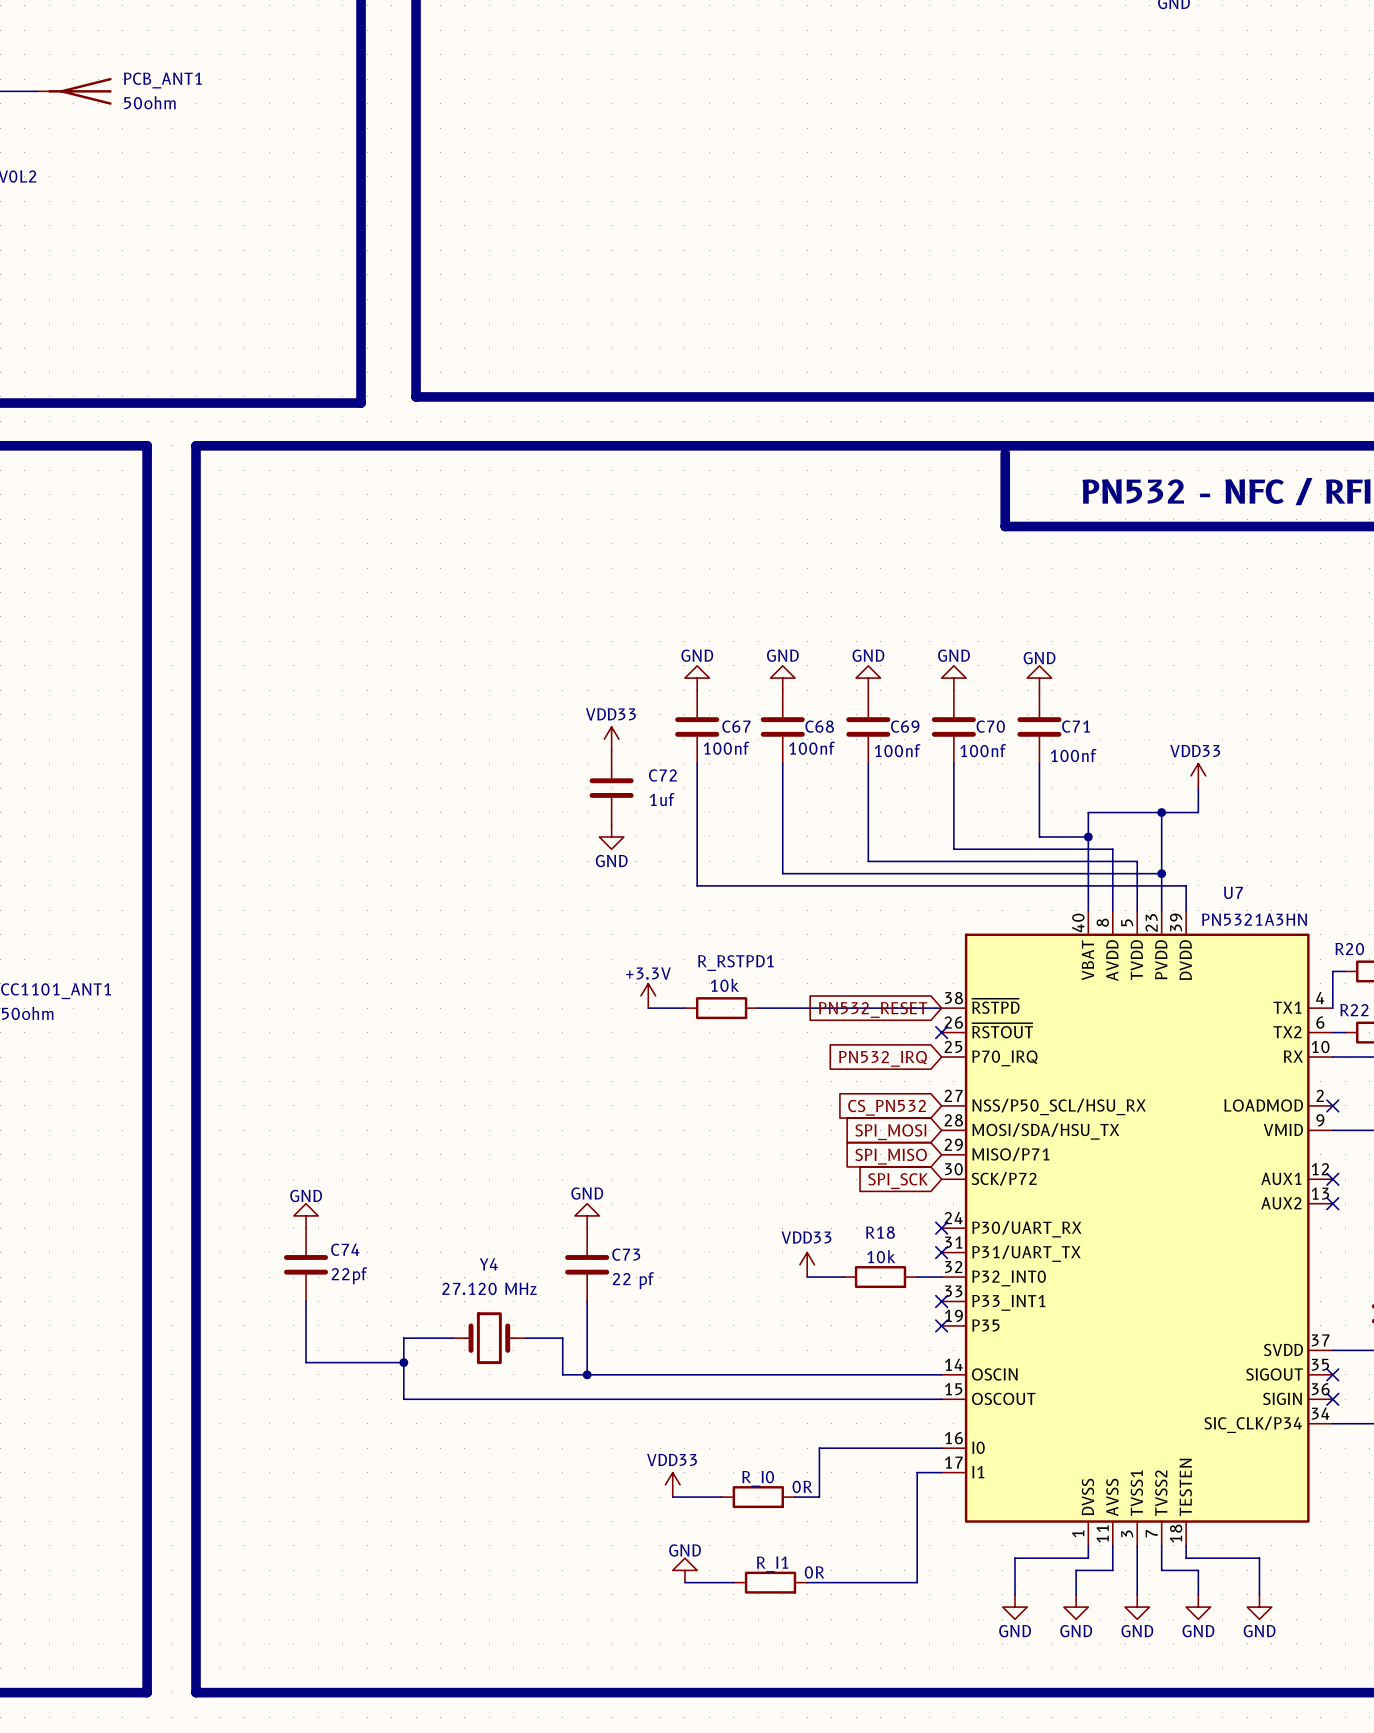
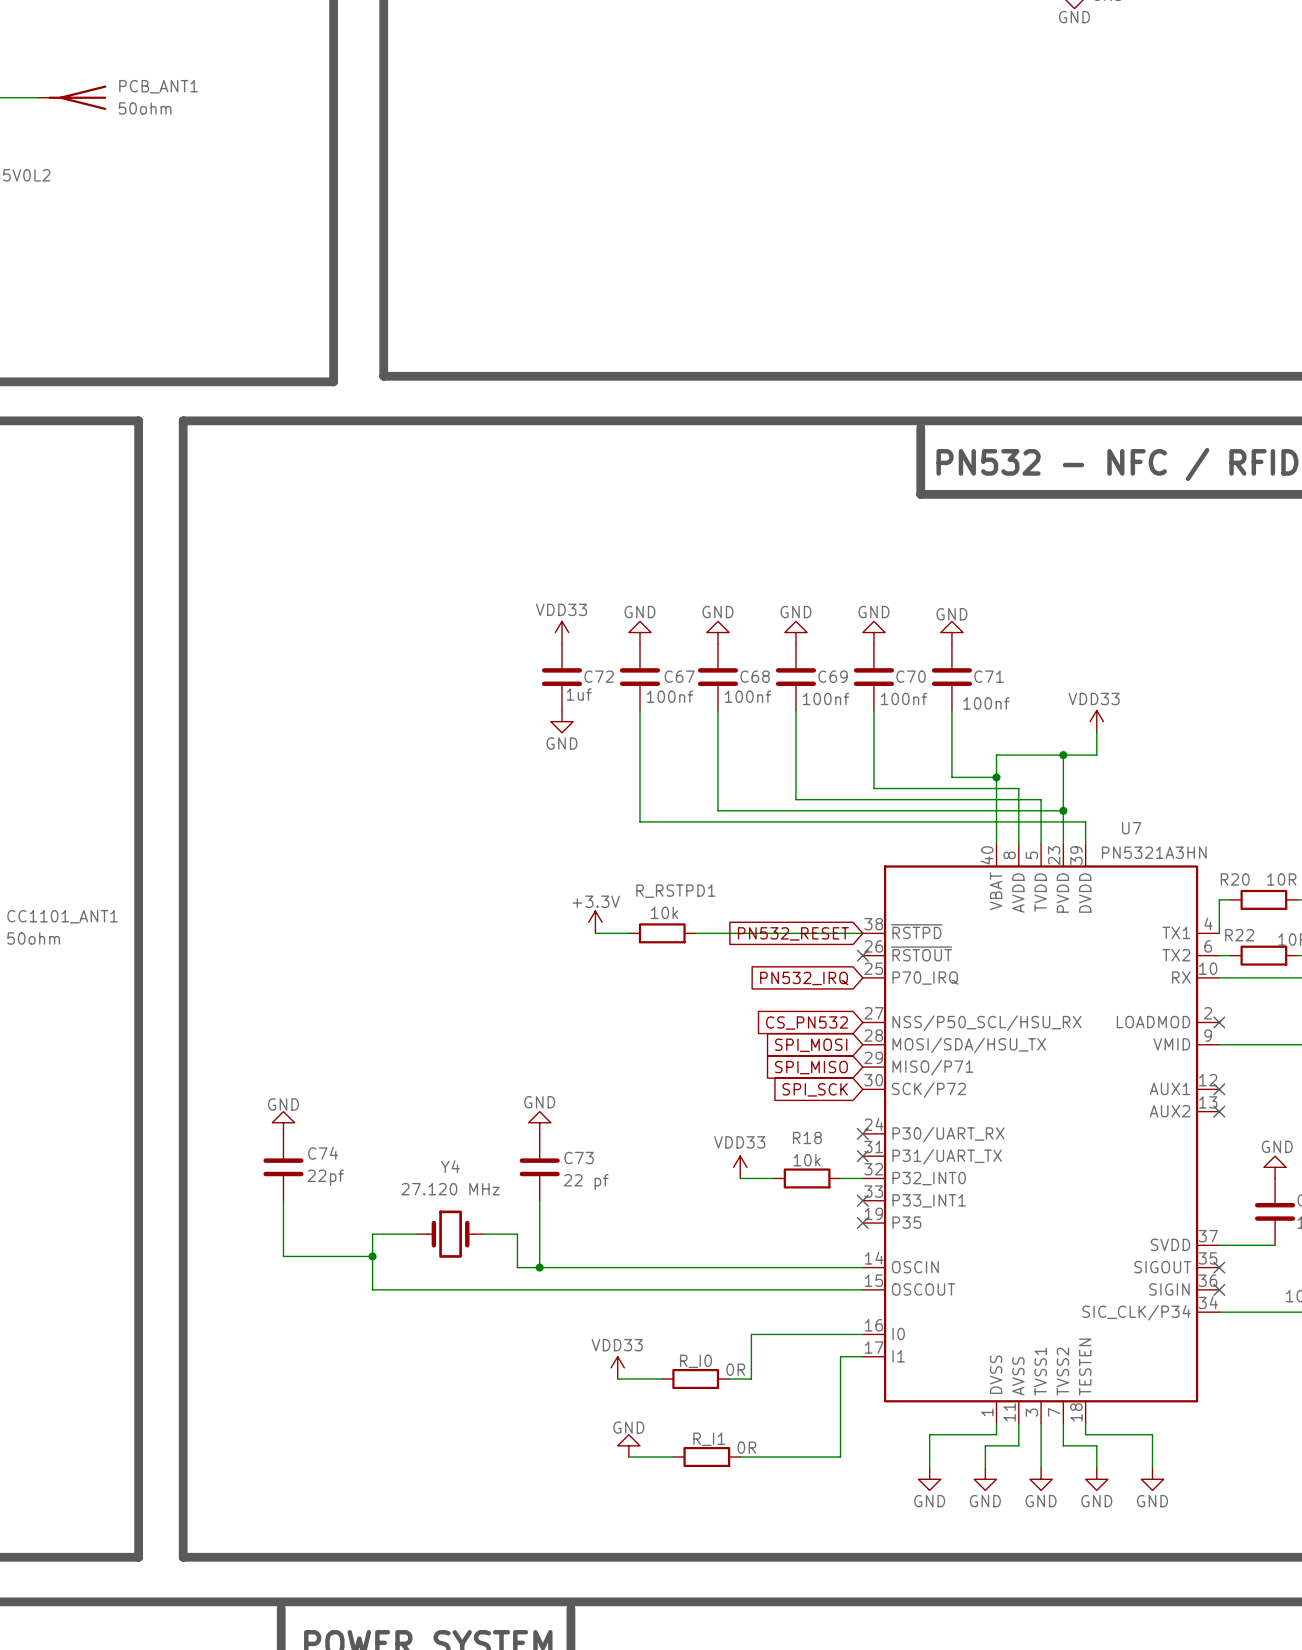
power symbol position: VDD33 (611, 739) -> VDD33 (562, 632)
C72 name position: C72 (662, 775) -> C72 (599, 676)
C72 position: (611, 788) -> (562, 677)
C72 value position: 1uf (662, 799) -> 1uf (579, 694)
power symbol position: GND (611, 836) -> GND (562, 721)

